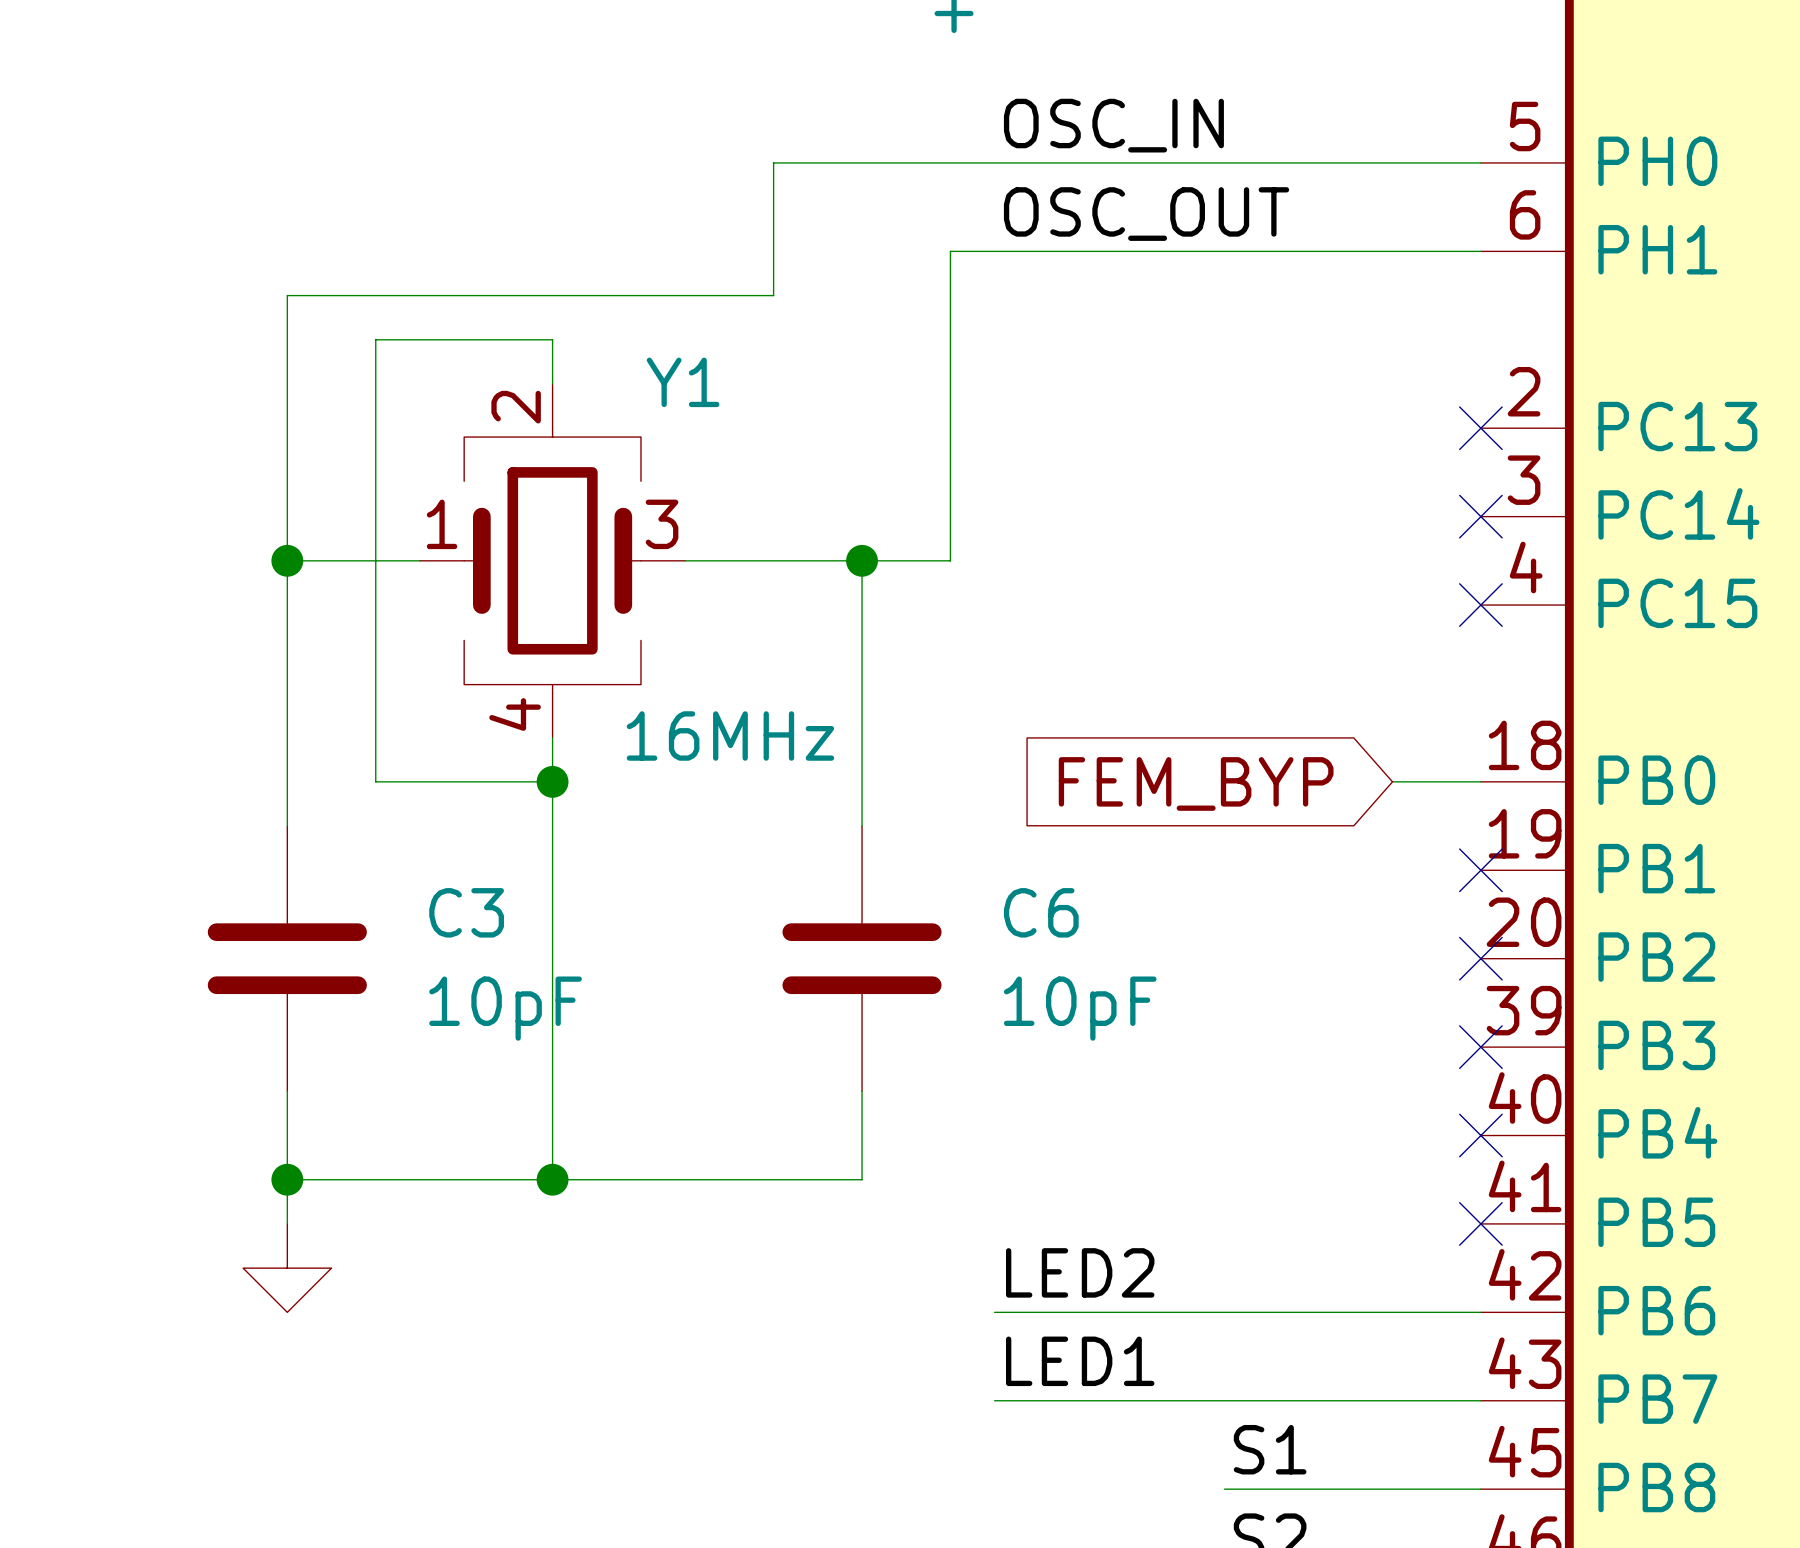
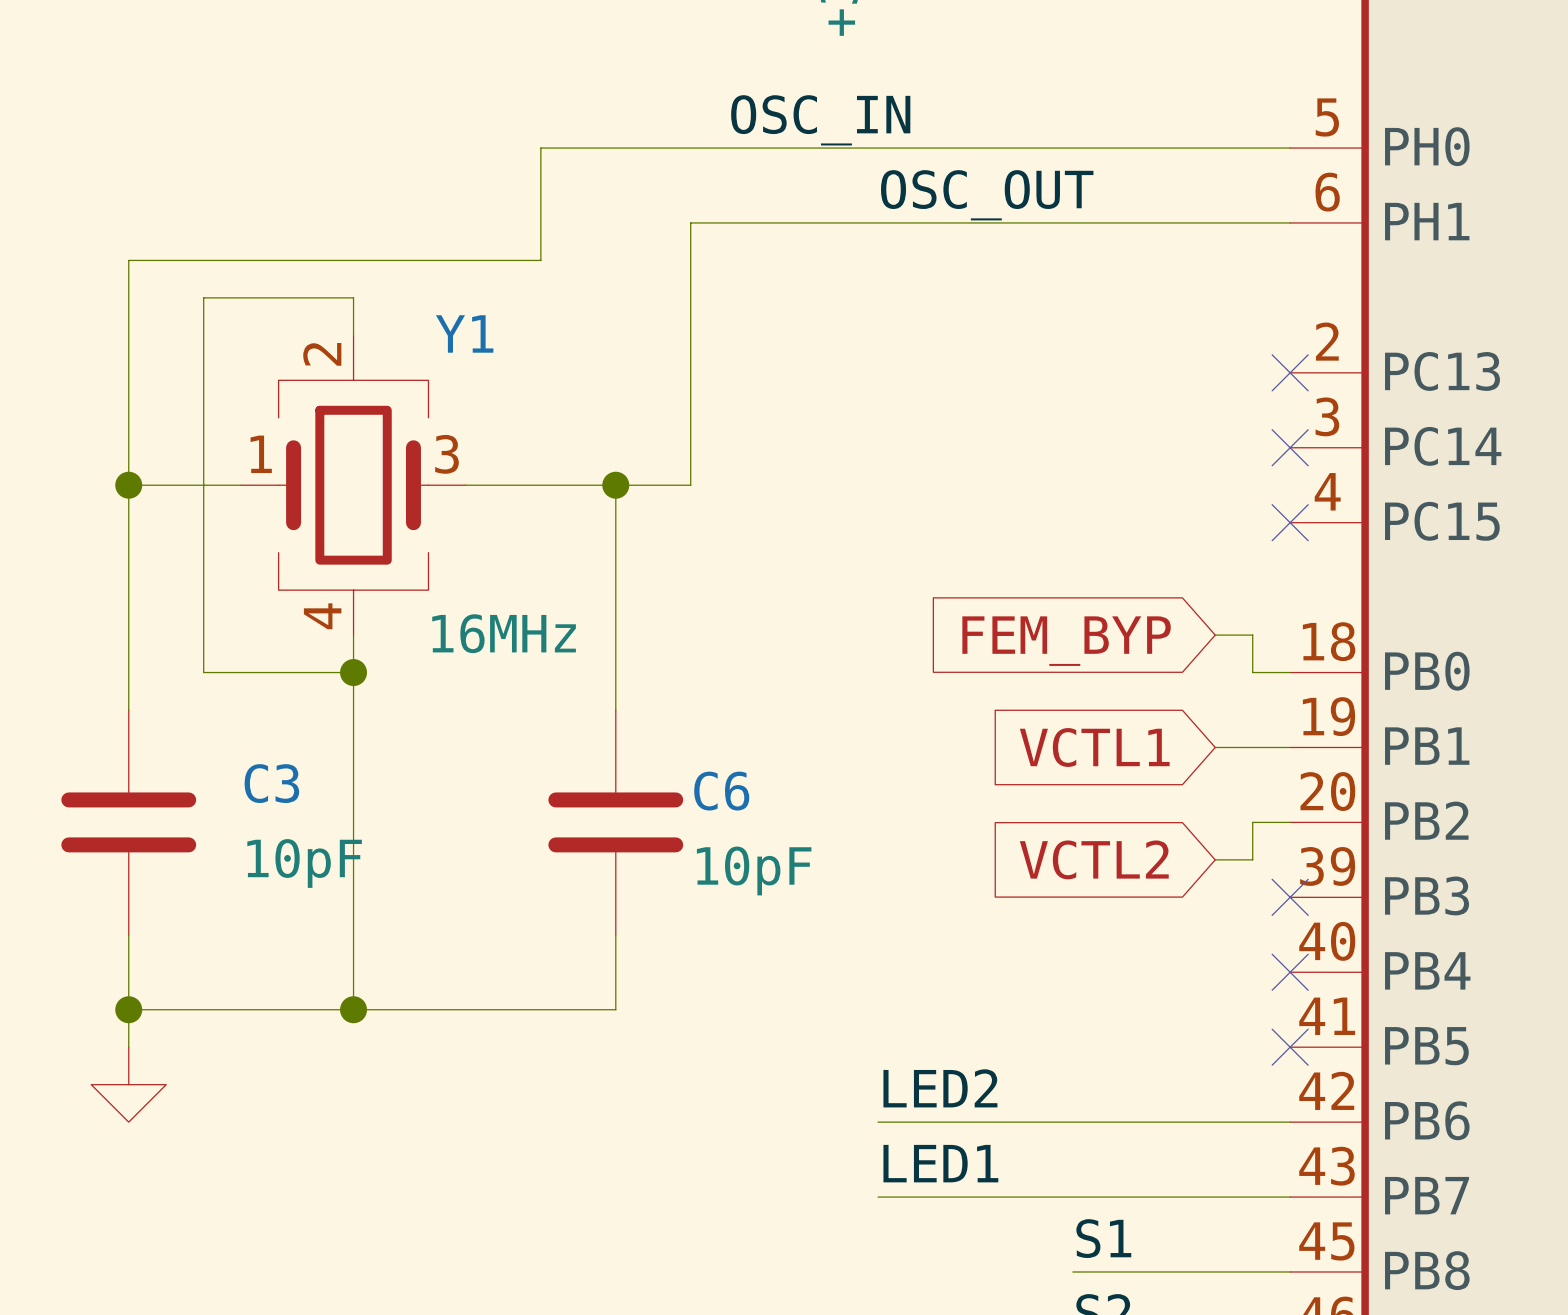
label position: OSC_IN (1113, 125) -> OSC_IN (820, 120)
wire: (773, 162) (773, 251) -> (840, 222) (690, 222)
wire: (950, 251) (950, 560) (773, 560) -> (690, 260) (690, 485)
wire: (287, 295) (287, 826) -> (278, 260) (128, 260) (128, 710)
wire: (596, 295) (773, 295) -> (540, 260) (540, 148) (690, 148)
wire: (375, 339) (552, 339) (552, 384) -> (353, 297) (203, 297) (203, 672) (353, 672) (353, 1009)
wire: (375, 384) (375, 737) -> none
junction: none -> (128, 485)
wire: (287, 560) (419, 560) -> (128, 485) (241, 485)
junction: (287, 560) -> none
wire: none -> (465, 485) (615, 485) (615, 710)
Y1 position: (552, 560) -> (353, 485)
junction: none -> (615, 485)
wire: (862, 560) (862, 826) -> none
junction: (862, 560) -> none
wire: (552, 737) (552, 1179) -> none
wire: (375, 781) (552, 781) -> (128, 1009) (278, 1009)
junction: none -> (353, 672)
junction: (552, 781) -> none
wire: (1392, 781) (1436, 781) -> (1215, 635) (1252, 635) (1252, 672)
global label position: FEM_BYP (1196, 783) -> FEM_BYP (1066, 641)
global label: none -> VCTL1 (1094, 747)
wire: none -> (1215, 747) (1290, 747)
no-connect mark: (1480, 870) -> none
C6 name position: C6 (1041, 912) -> C6 (721, 791)
C3 position: (287, 958) -> (128, 822)
C6 position: (862, 958) -> (615, 822)
wire: none -> (1290, 822) (1252, 822) (1252, 859) (1215, 859)
no-connect mark: (1480, 958) -> none
global label: none -> VCTL2 (1094, 859)
C6 value position: 10pF (1080, 1008) -> 10pF (754, 870)
wire: (287, 1091) (287, 1223) -> (128, 934) (128, 1047)
wire: (862, 1091) (862, 1179) (685, 1179) -> (615, 934) (615, 1009)
junction: none -> (128, 1009)
junction: (287, 1179) -> none
junction: none -> (353, 1009)
junction: (552, 1179) -> none
power symbol position: (287, 1268) -> (128, 1084)

